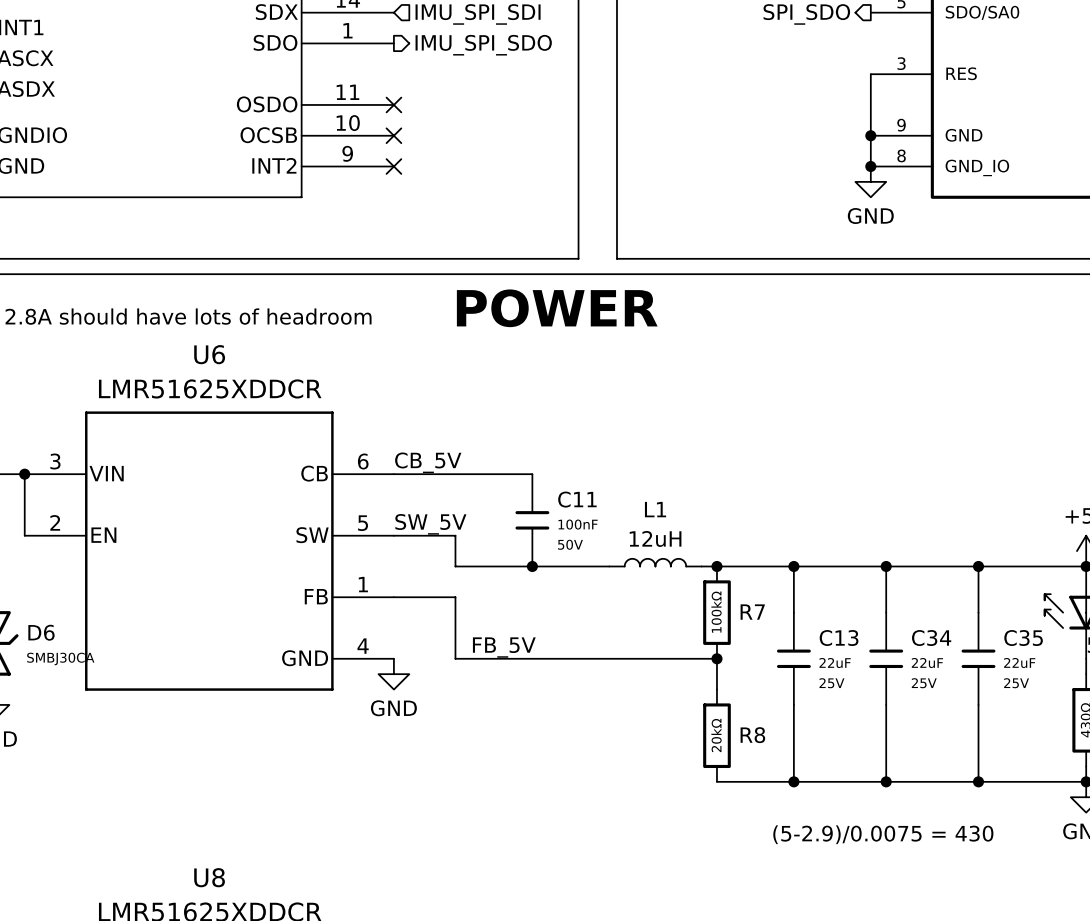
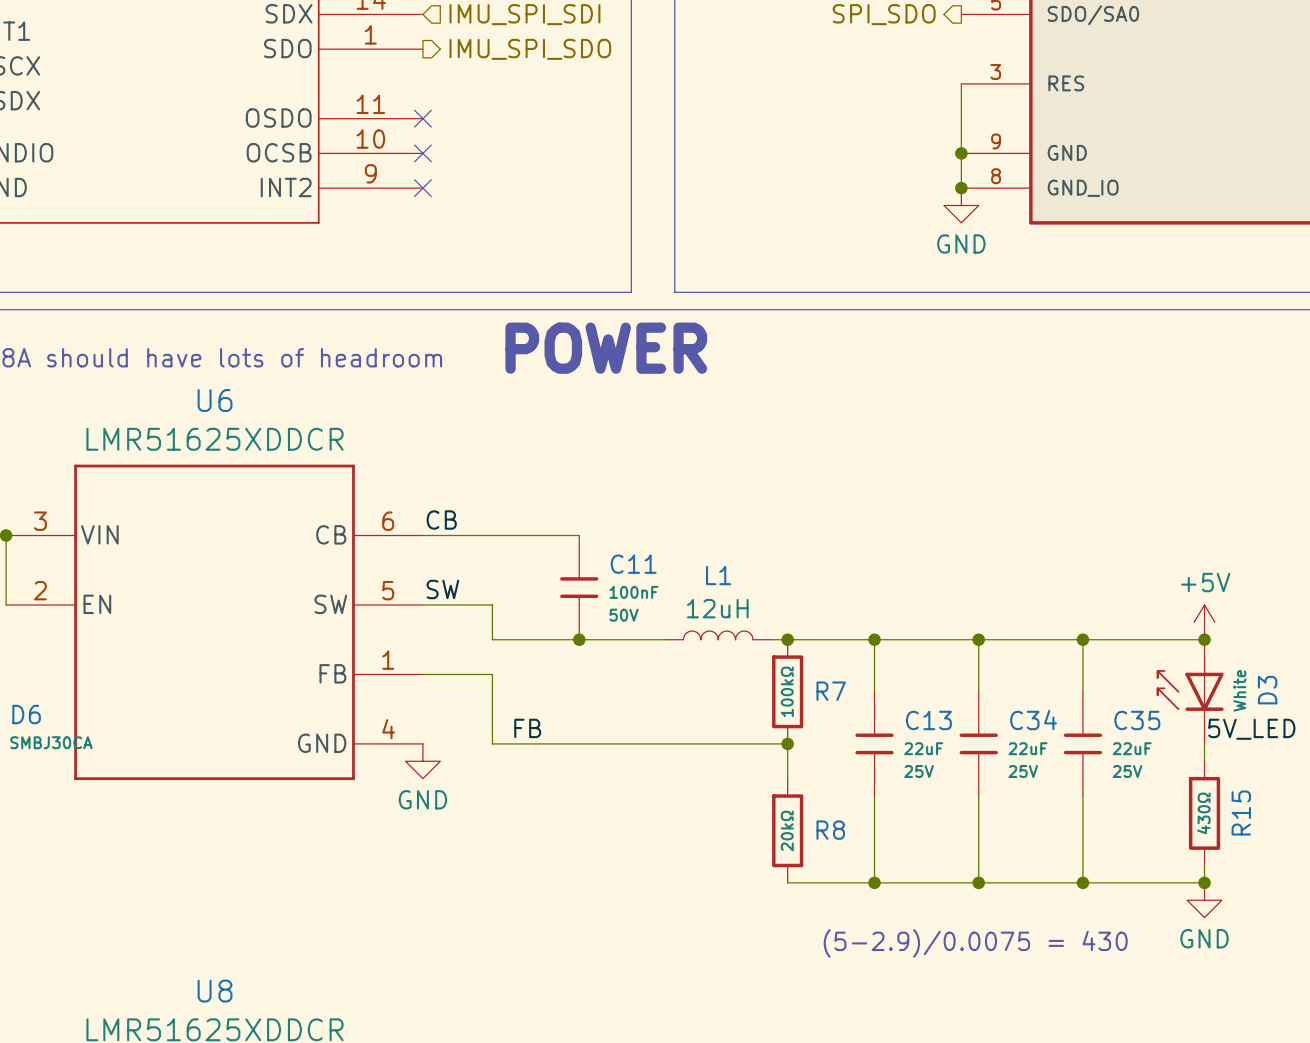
label: CB_5V (428, 462) -> CB (441, 520)
label: SW_5V (430, 524) -> SW (442, 589)
label: FB_5V (504, 647) -> FB (527, 728)

